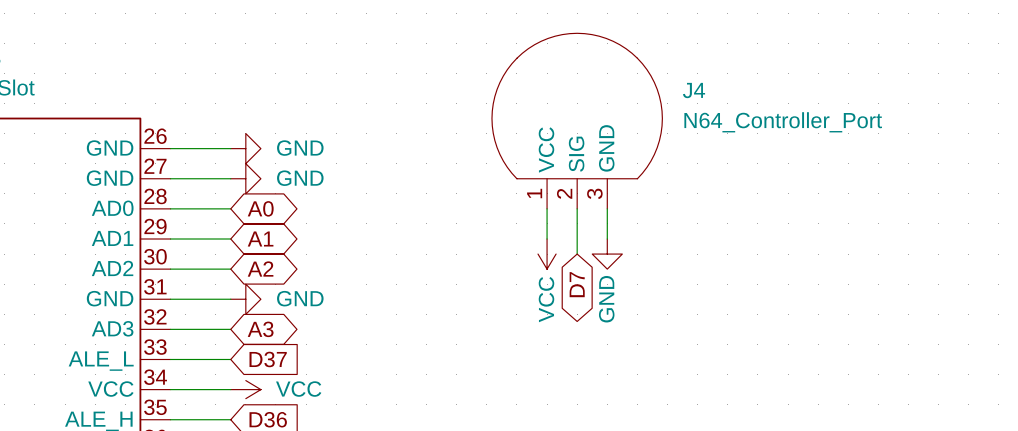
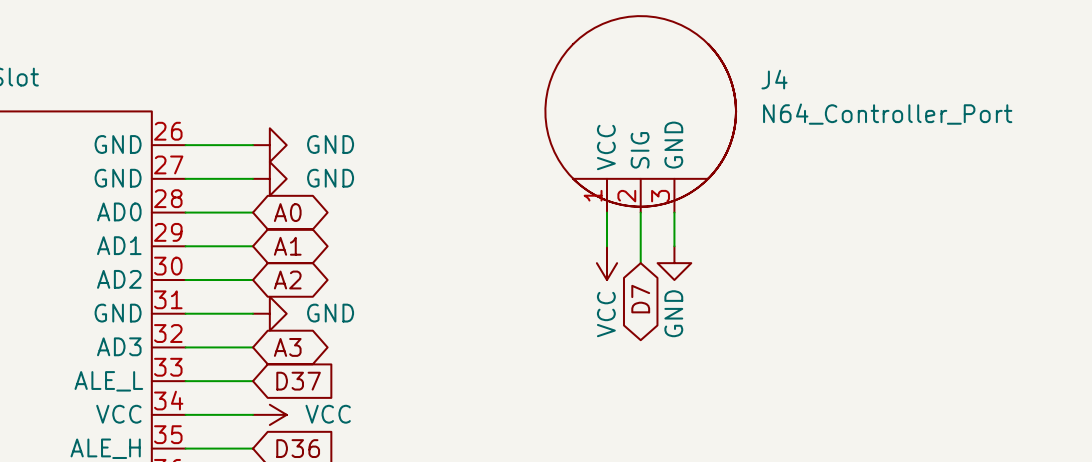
J4 symbol: [491, 33, 663, 209] -> [545, 16, 737, 213]

